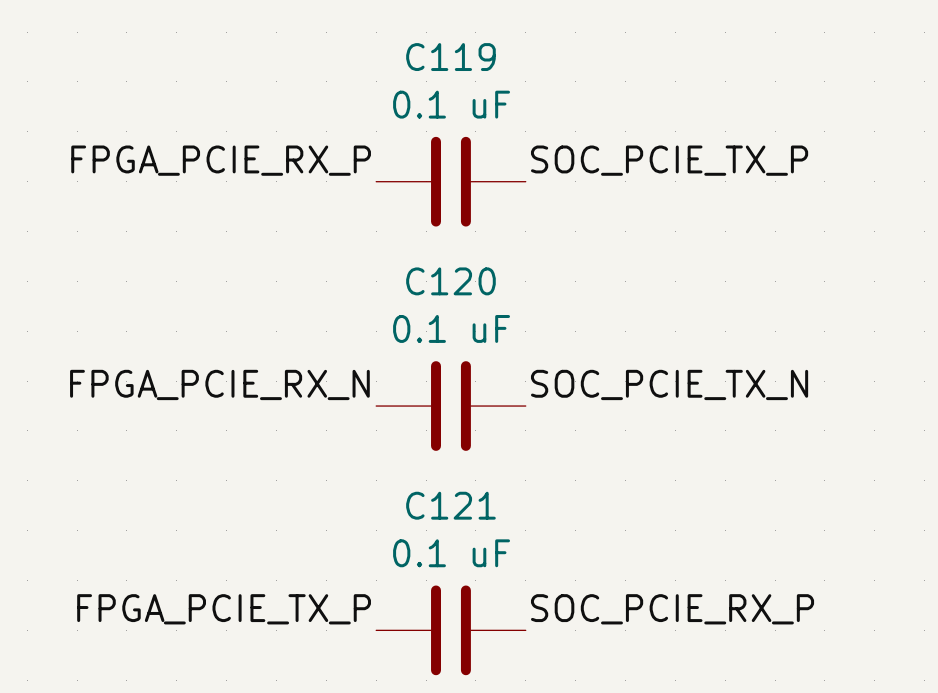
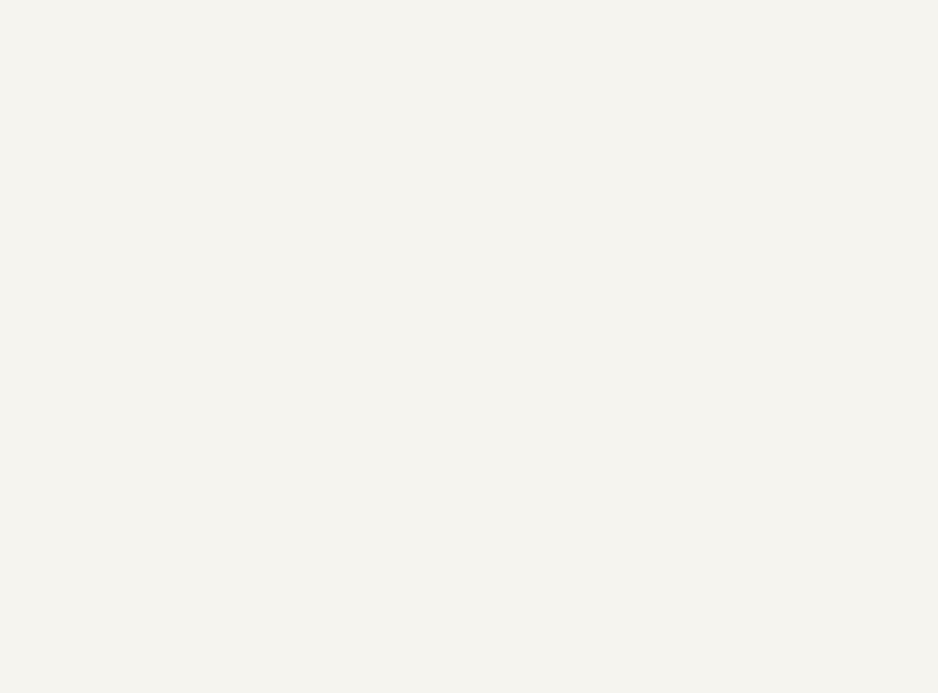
label: FPGA_PCIE_RX_P (221, 160) -> none
label: SOC_PCIE_TX_P (669, 160) -> none
C119: 0.1 uF (450, 181) -> none
label: FPGA_PCIE_RX_N (219, 384) -> none
label: SOC_PCIE_TX_N (669, 384) -> none
C120: 0.1 uF (450, 406) -> none
label: FPGA_PCIE_TX_P (224, 609) -> none
label: SOC_PCIE_RX_P (672, 609) -> none
C121: 0.1 uF (450, 630) -> none

